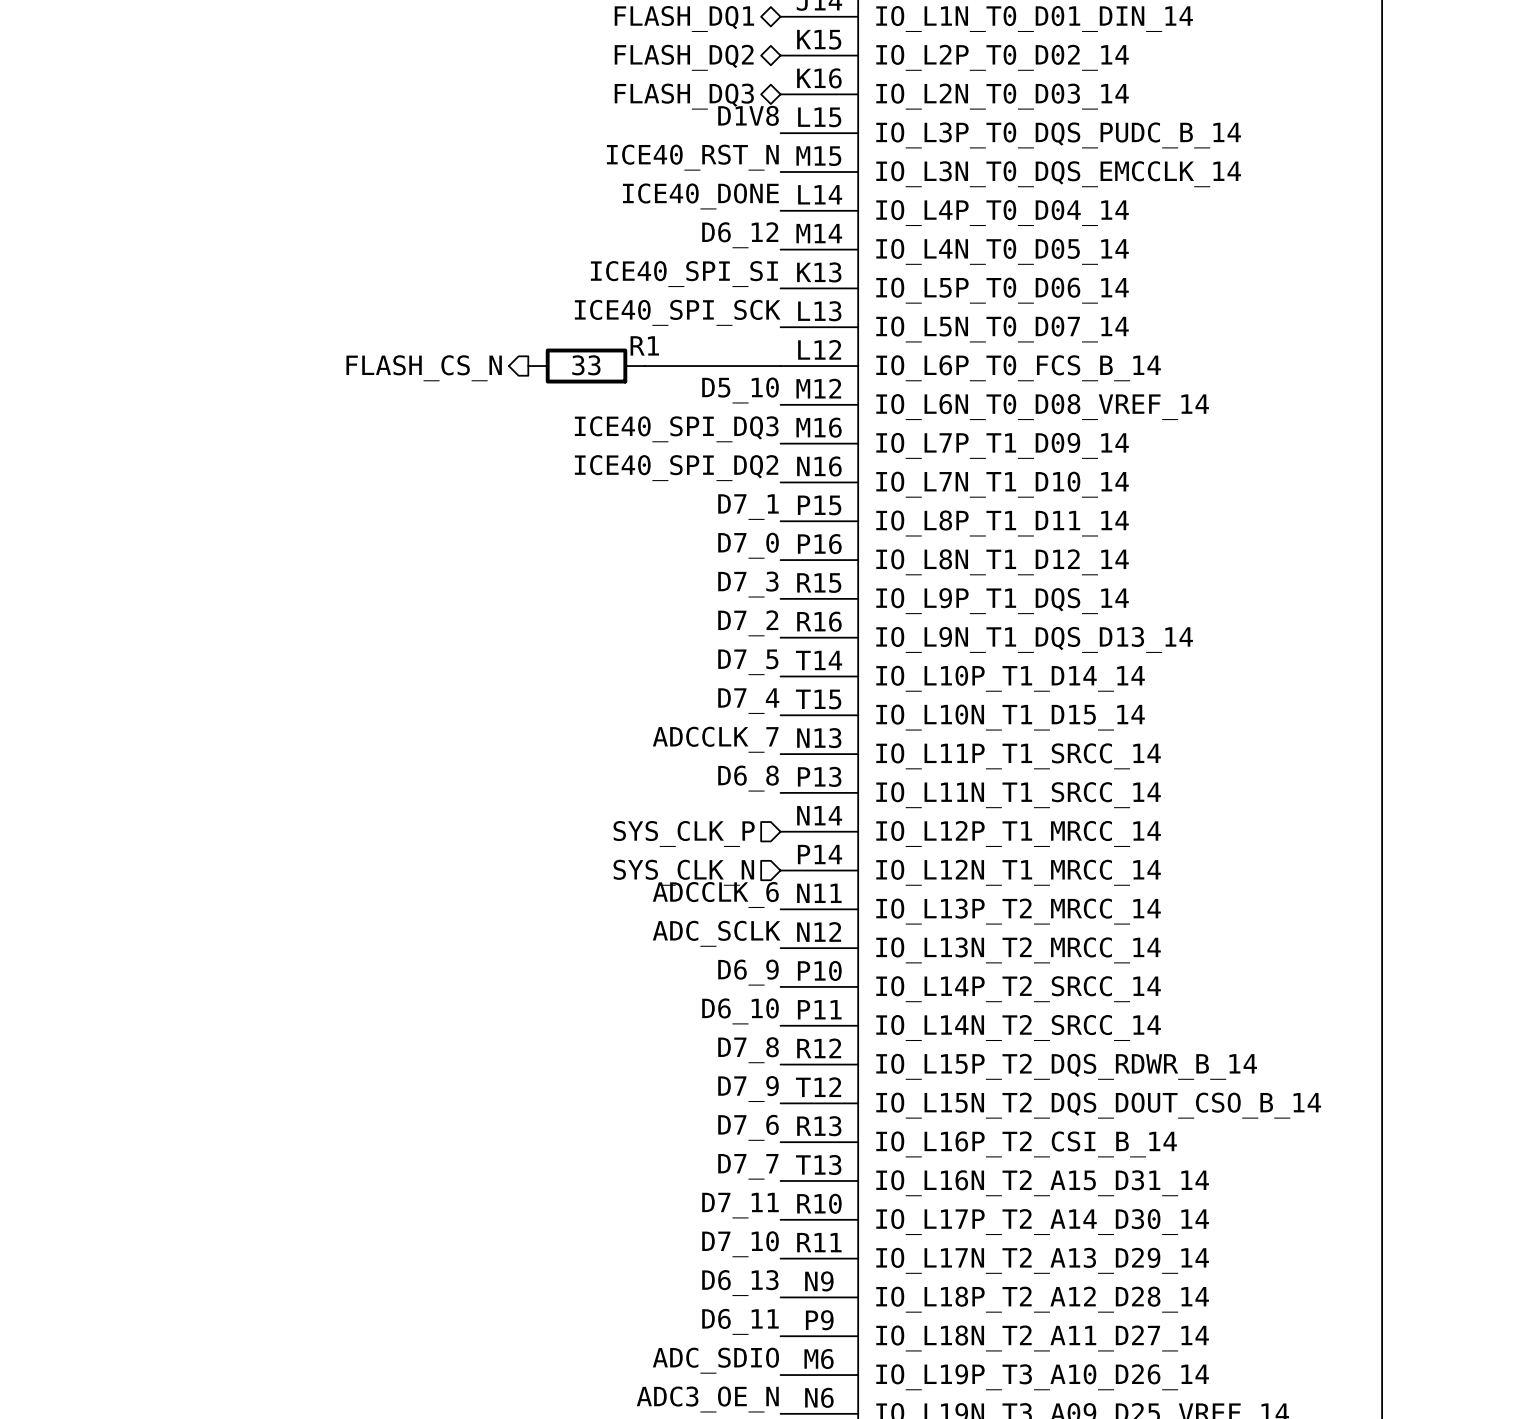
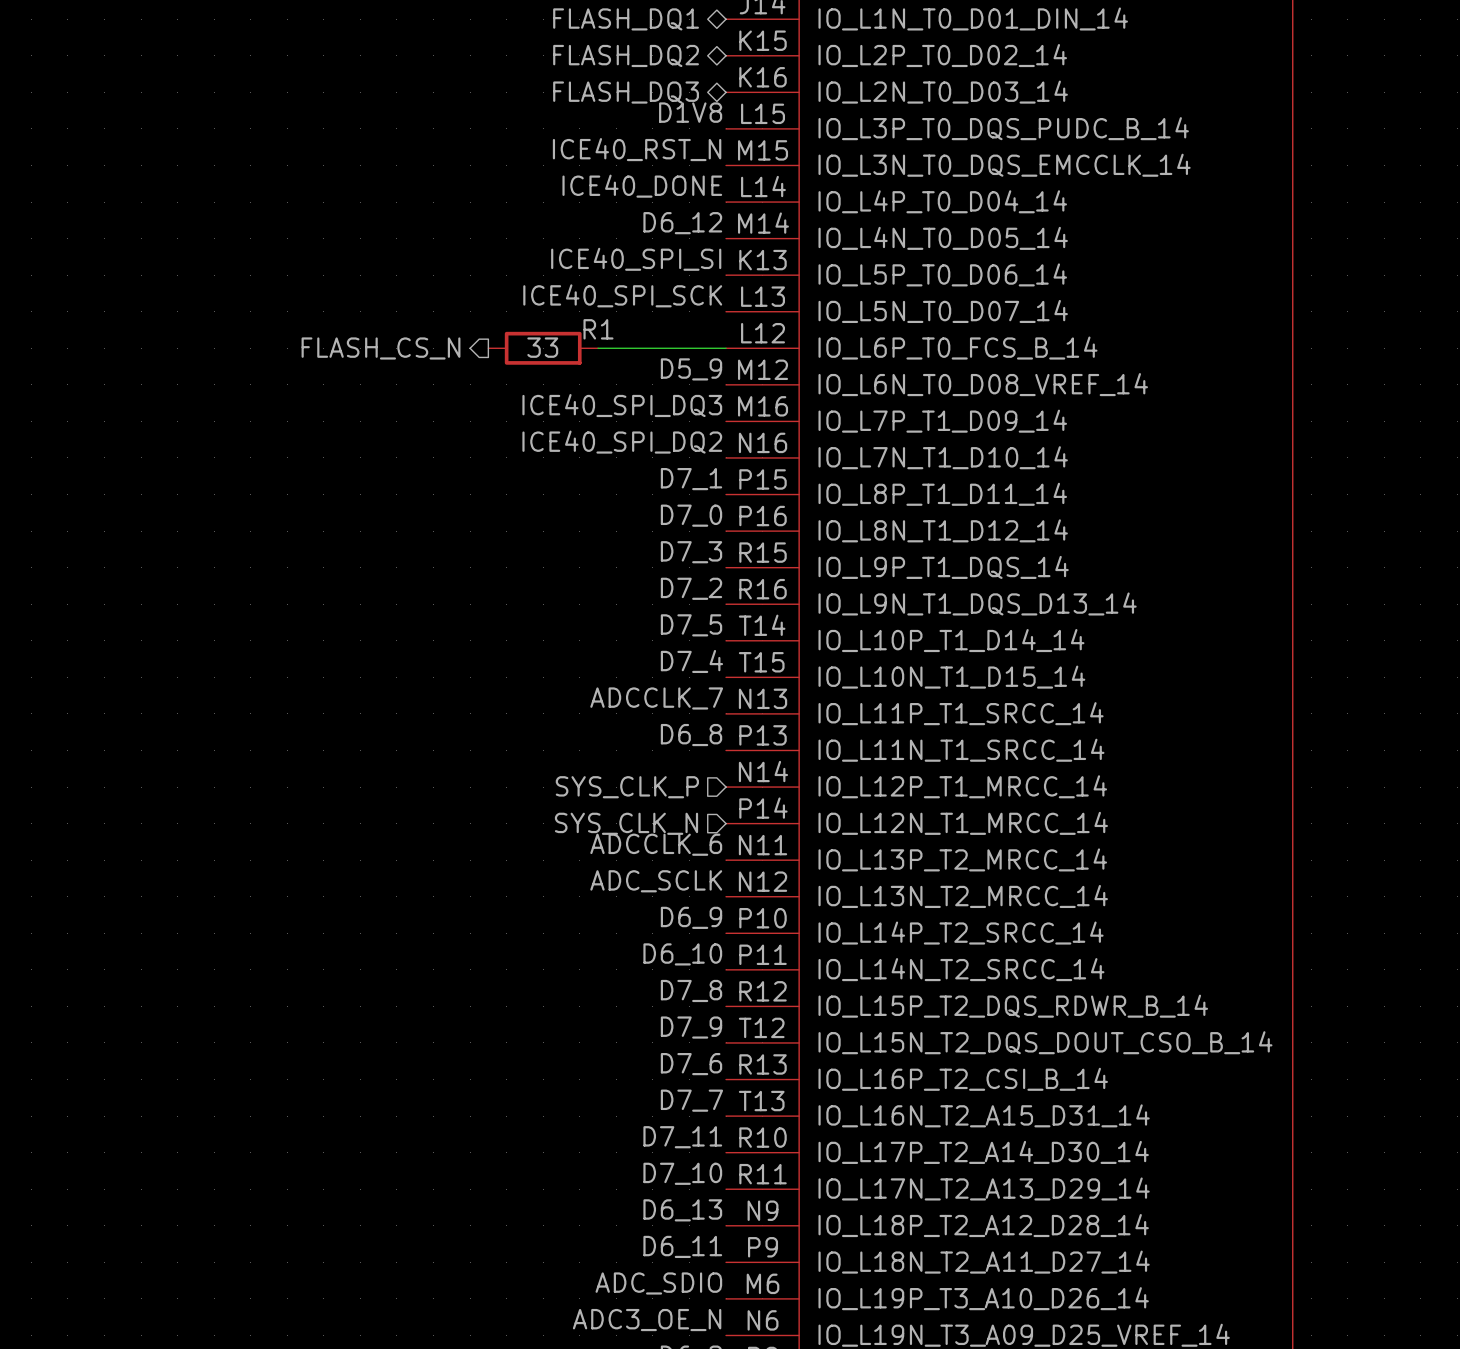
label: D5_10 (740, 390) -> D5_9 (691, 369)

